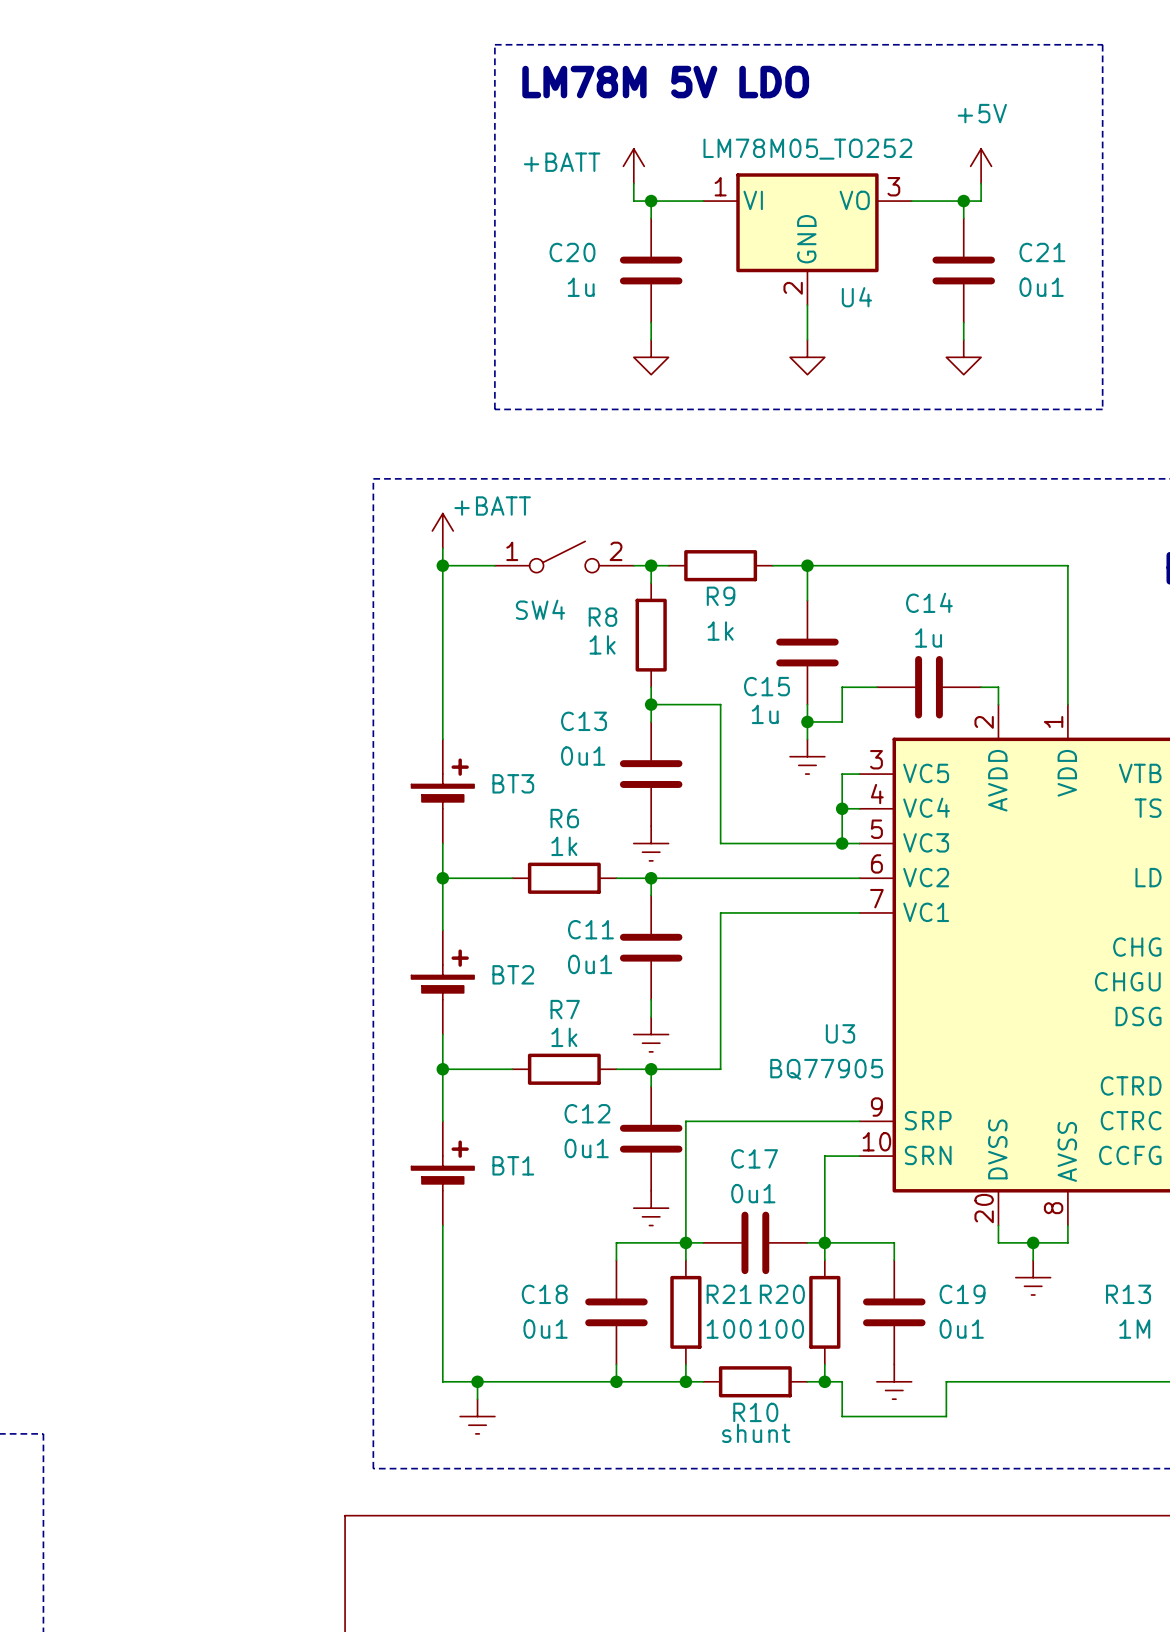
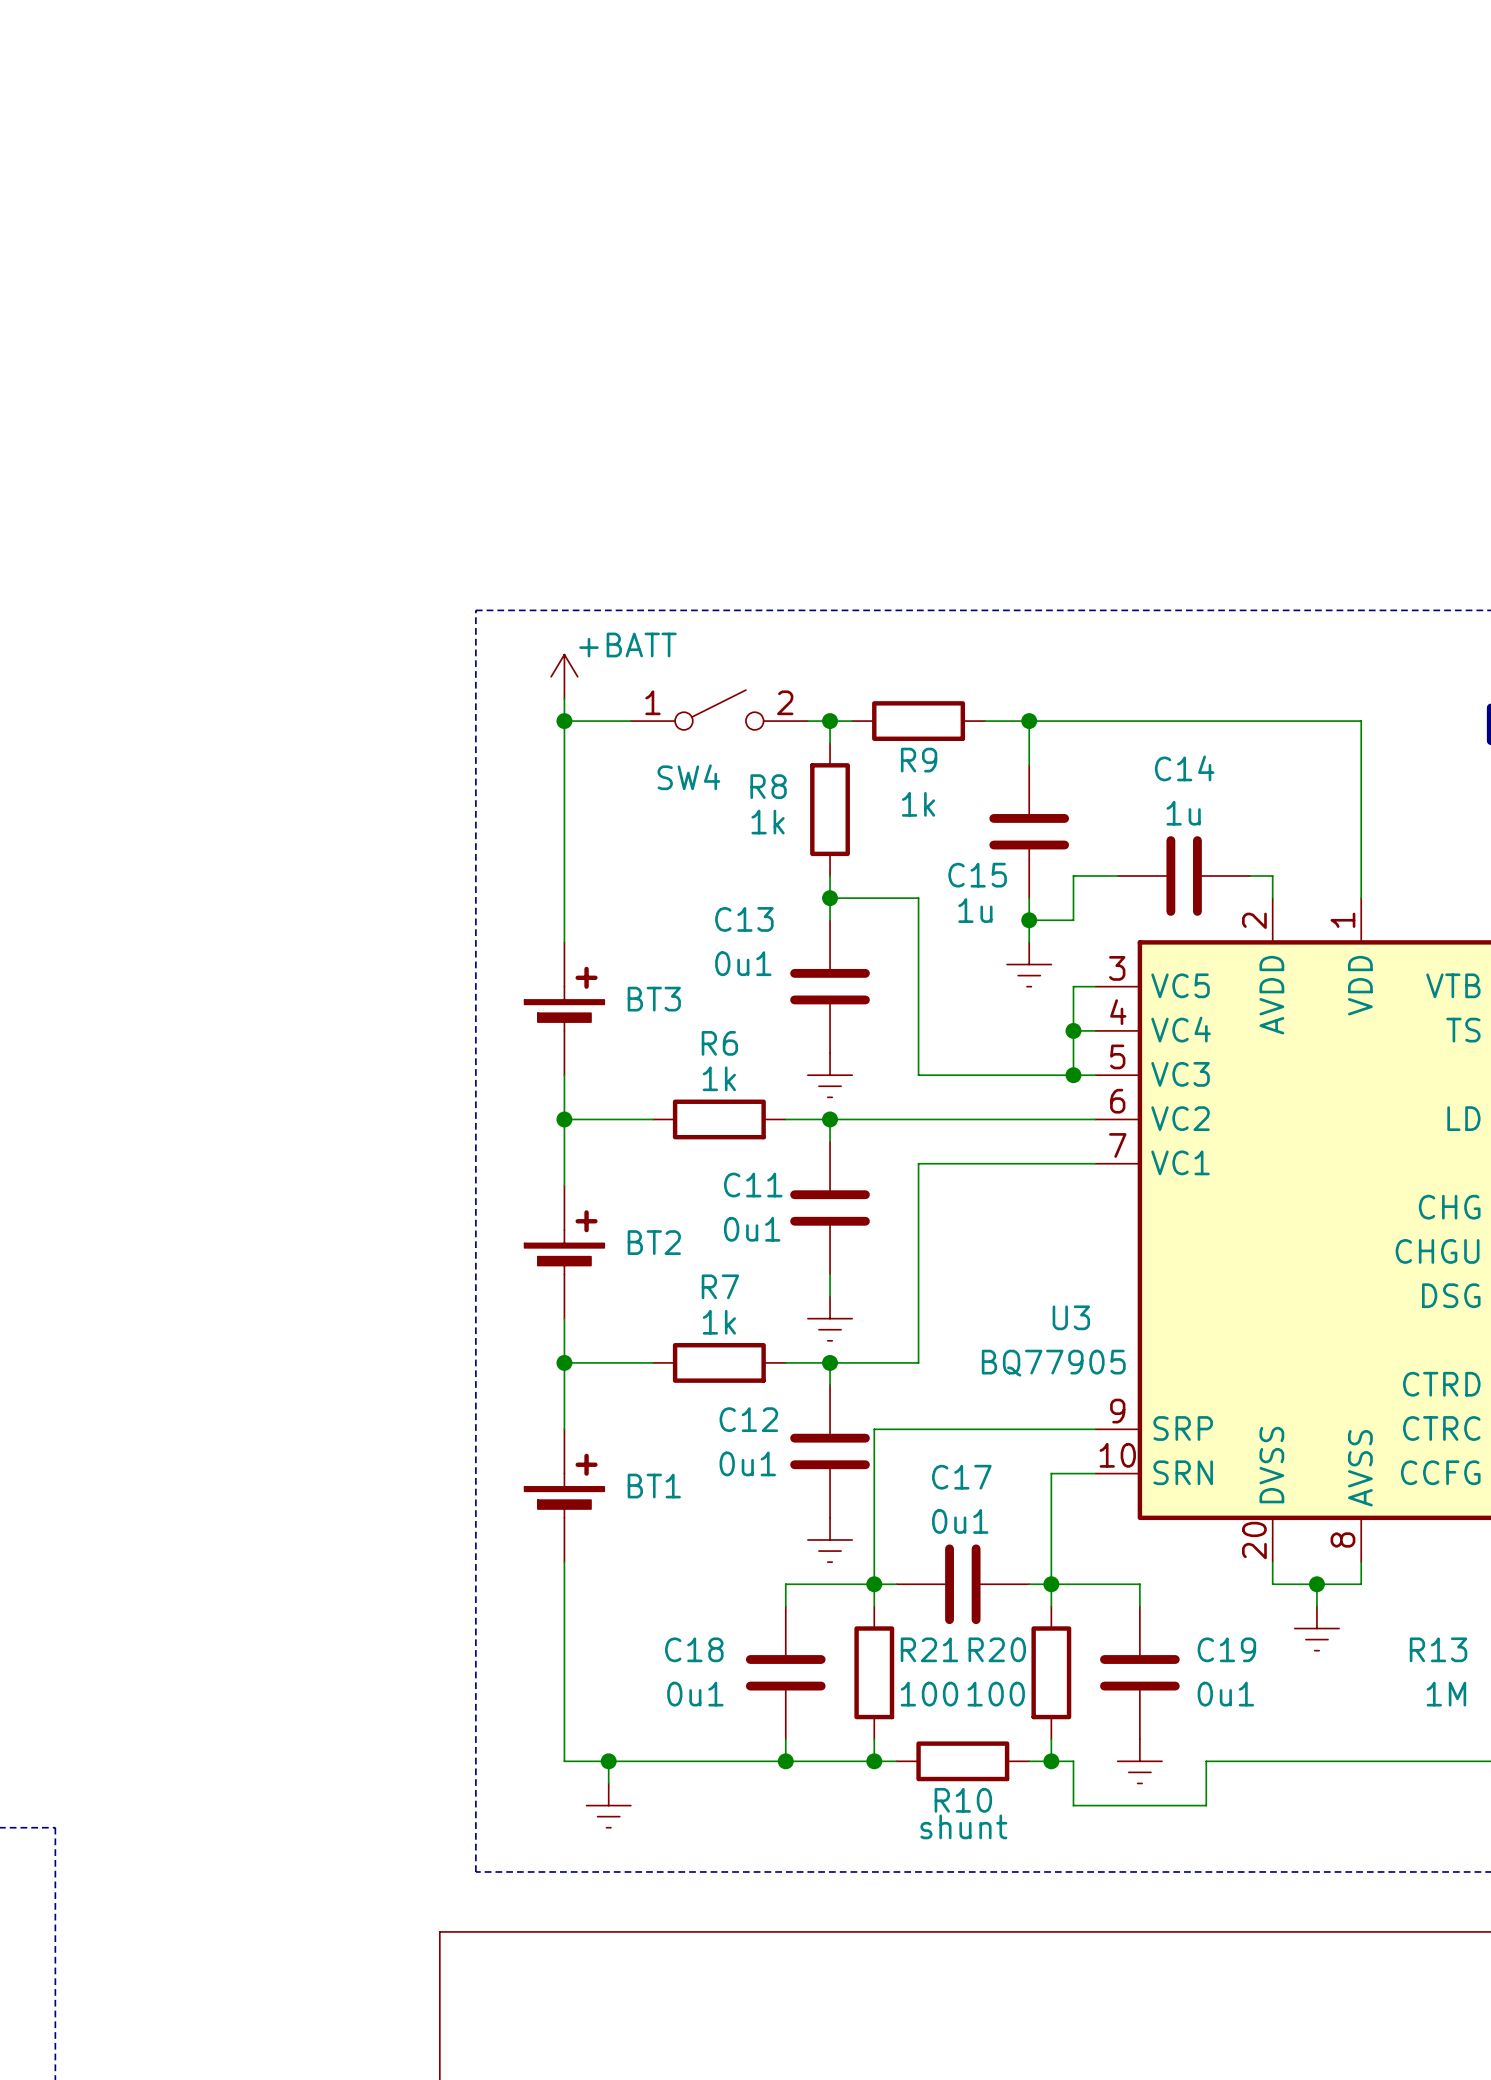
line: (494, 44) (1102, 44) (1102, 409) (494, 409) (494, 44) -> none
text: LM78M 5V LDO (665, 82) -> none
power symbol: +BATT (633, 166) -> none
power symbol: +5V (981, 166) -> none
wire: (633, 183) (633, 201) (703, 201) -> none
wire: (981, 183) (981, 201) (911, 201) -> none
wire: (651, 201) (651, 218) -> none
junction: (651, 201) -> none
wire: (963, 201) (963, 218) -> none
junction: (963, 201) -> none
U4: LM78M05_TO252 (807, 239) -> none
C20: 1u (651, 270) -> none
C21: 0u1 (963, 270) -> none
wire: (807, 305) (807, 339) -> none
wire: (651, 322) (651, 339) -> none
wire: (963, 322) (963, 339) -> none
power symbol: (651, 357) -> none
power symbol: (807, 357) -> none
power symbol: (963, 357) -> none

